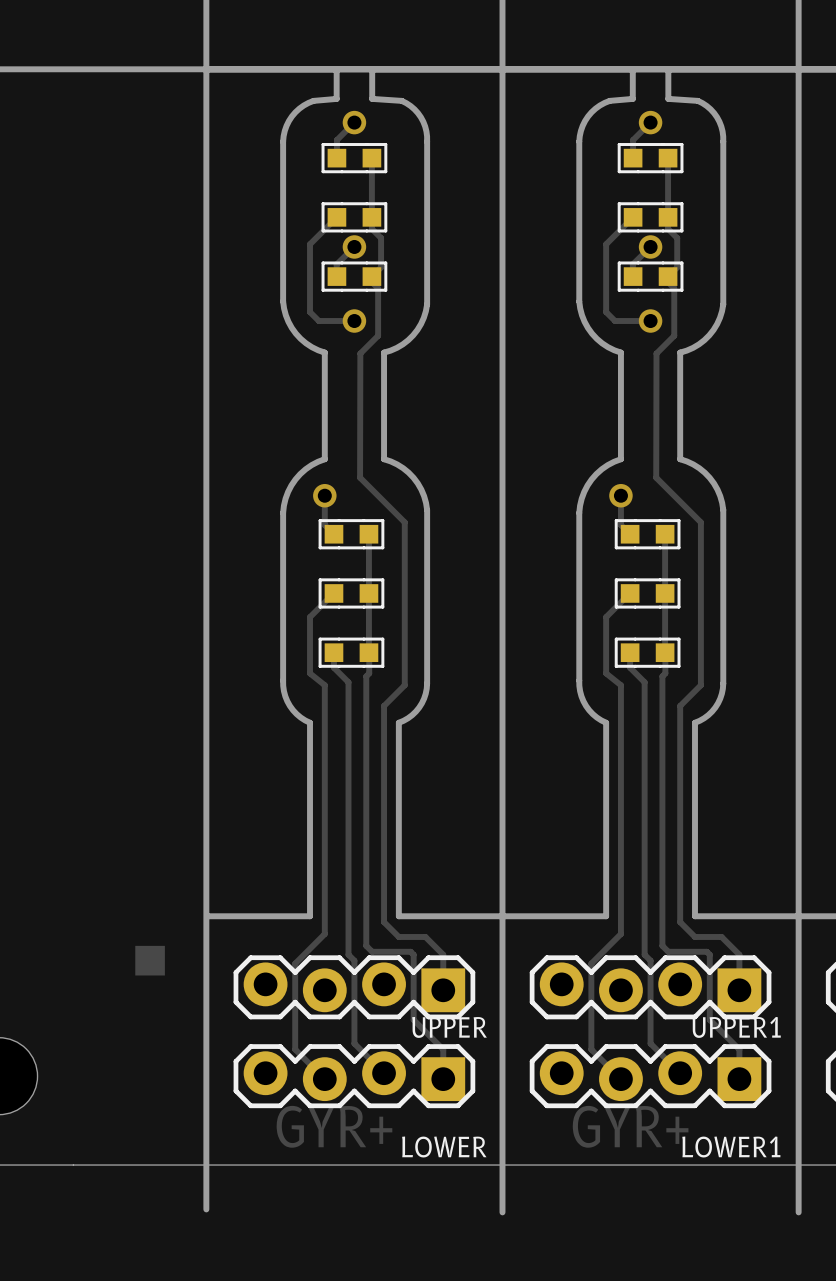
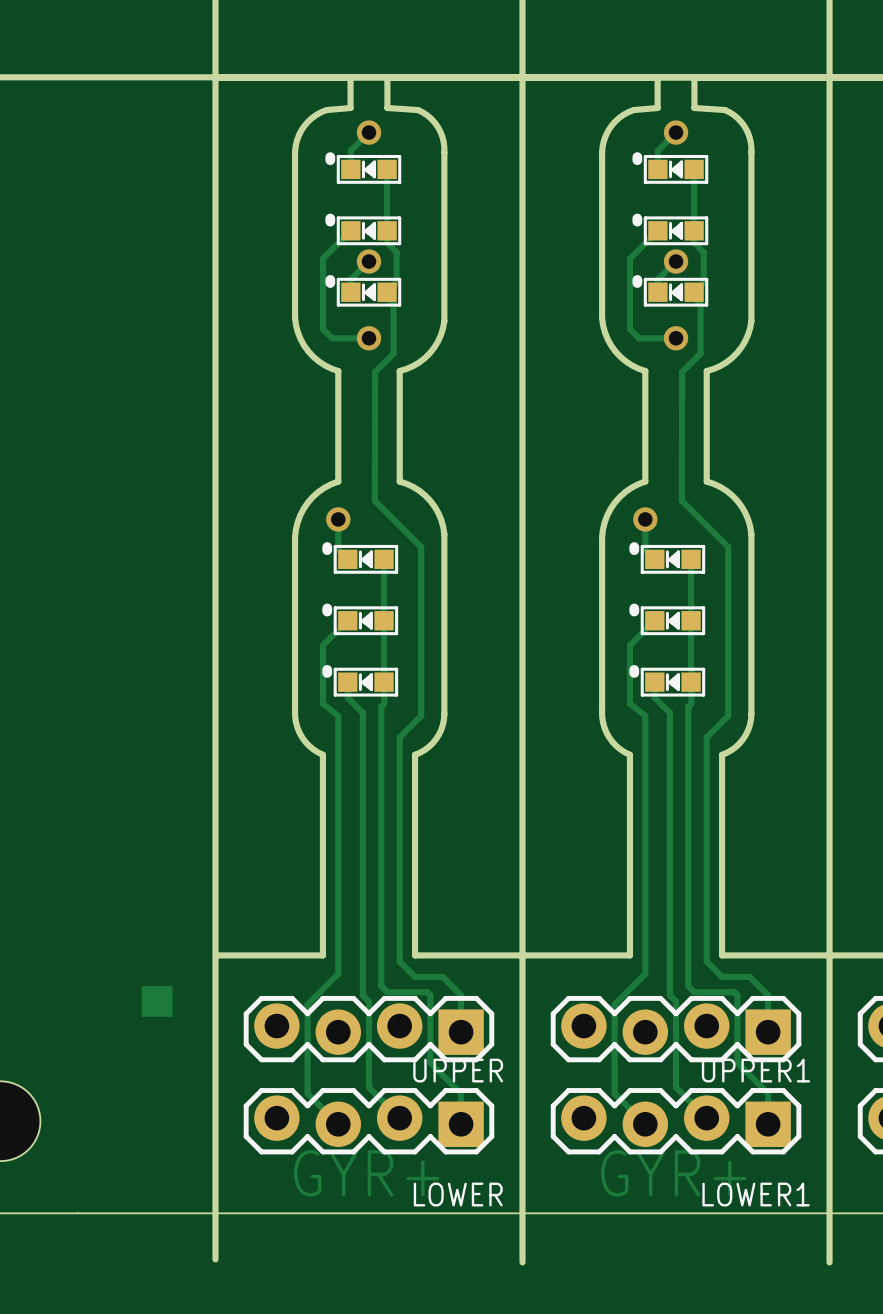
part footprint: [321, 143, 388, 174] -> [325, 152, 402, 184]
part footprint: [617, 143, 684, 174] -> [632, 152, 709, 184]
part footprint: [321, 202, 388, 233] -> [325, 213, 402, 246]
part footprint: [617, 202, 684, 233] -> [632, 213, 709, 246]
part footprint: [321, 261, 388, 292] -> [325, 275, 402, 307]
part footprint: [617, 261, 684, 292] -> [632, 275, 709, 307]
part footprint: [318, 519, 385, 550] -> [322, 542, 399, 574]
part footprint: [614, 519, 681, 550] -> [629, 542, 706, 574]
part footprint: [318, 578, 385, 609] -> [322, 603, 399, 636]
part footprint: [614, 578, 681, 609] -> [629, 603, 706, 636]
part footprint: [318, 637, 385, 668] -> [322, 664, 399, 697]
part footprint: [614, 637, 681, 668] -> [629, 664, 706, 697]

